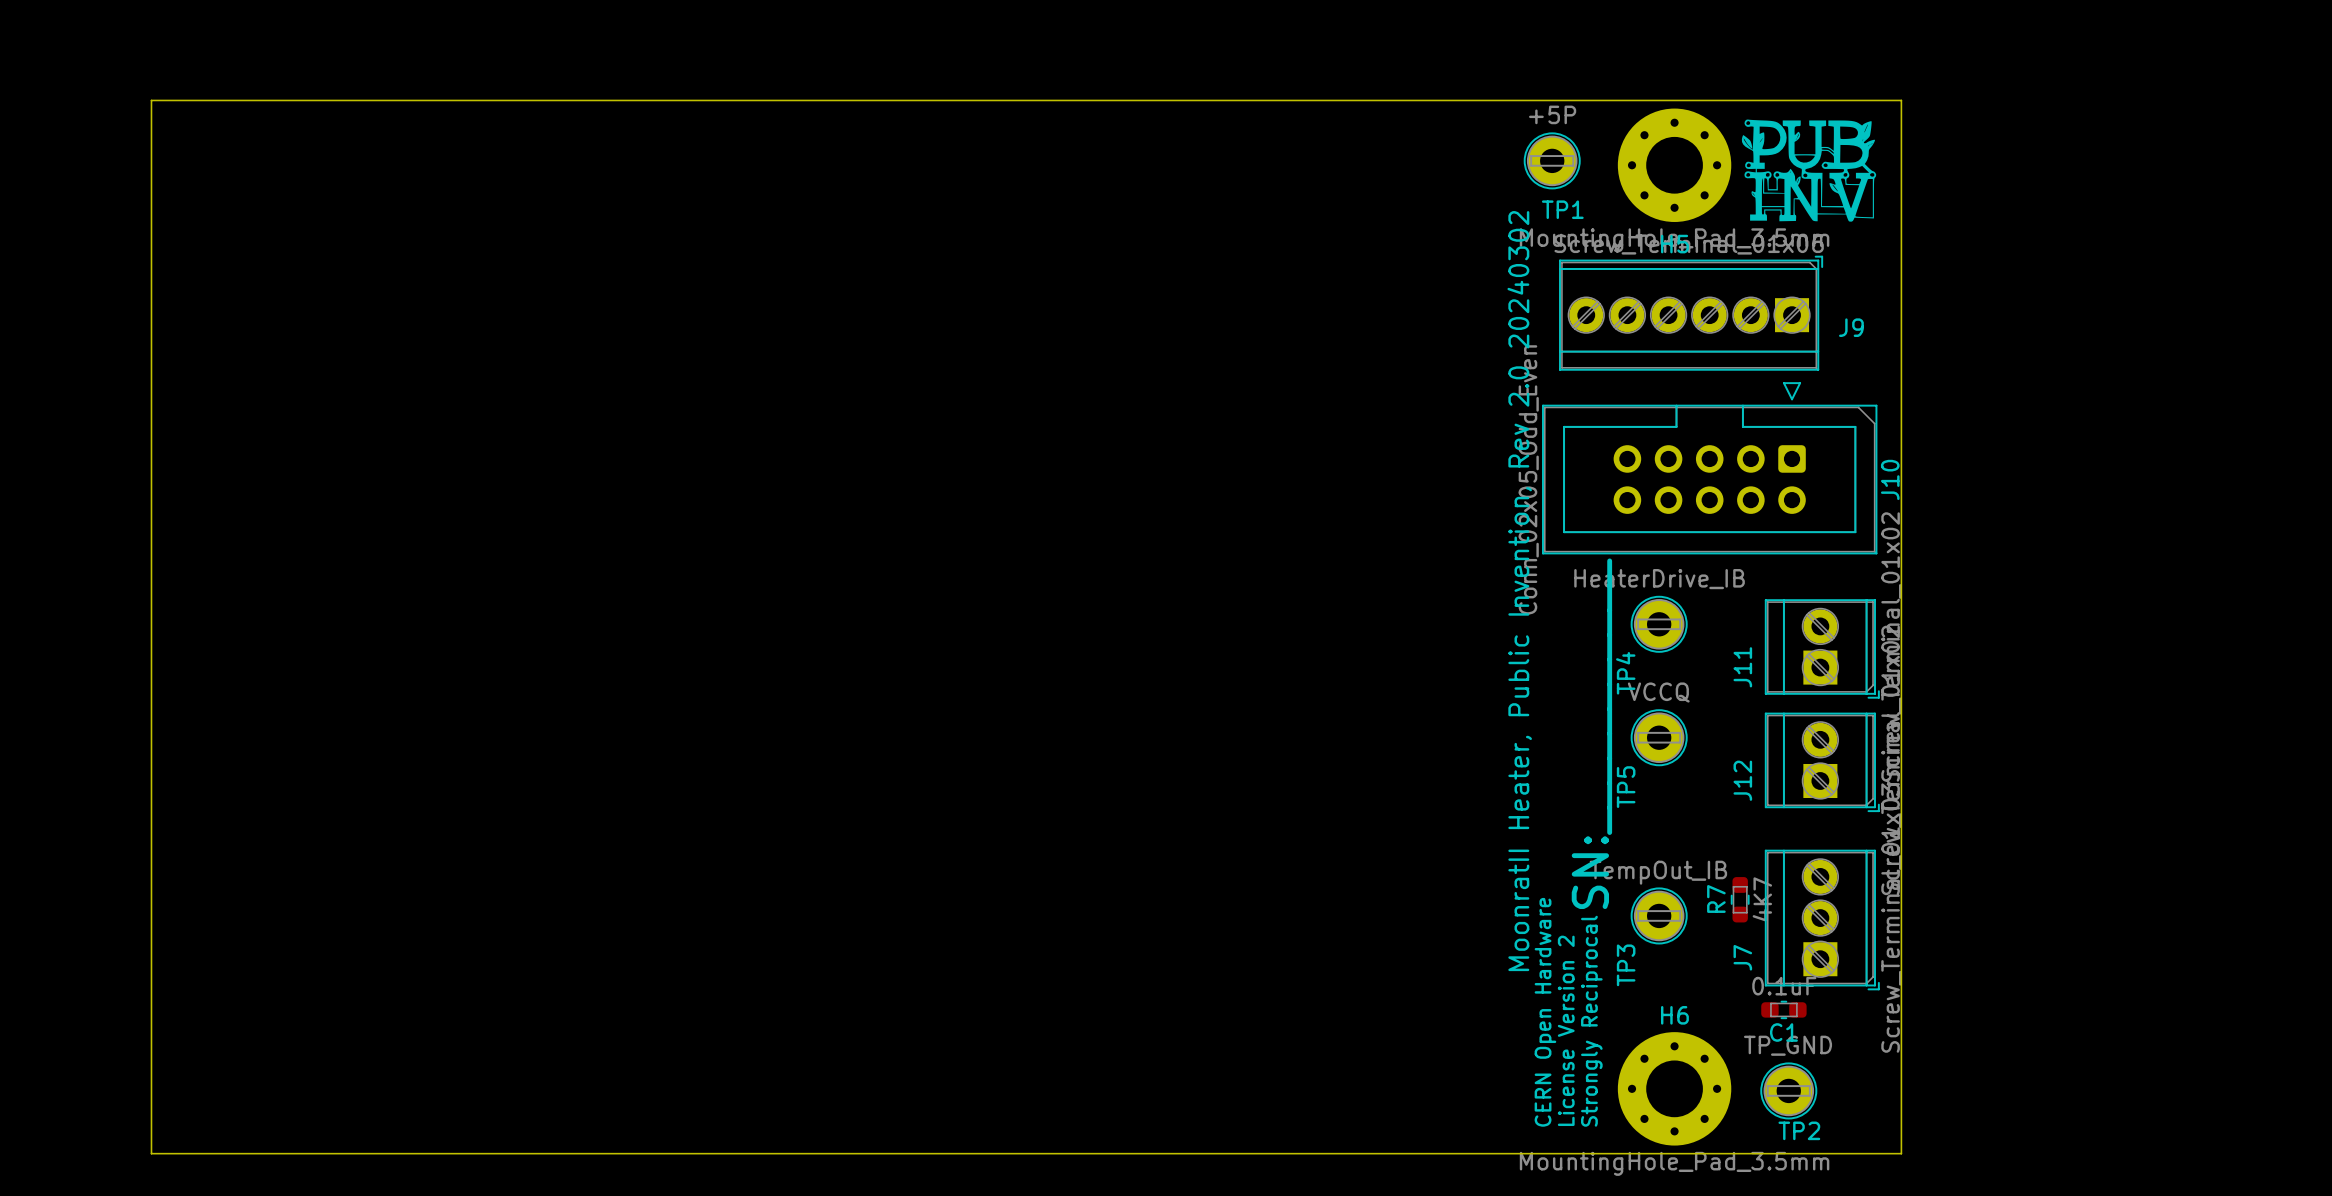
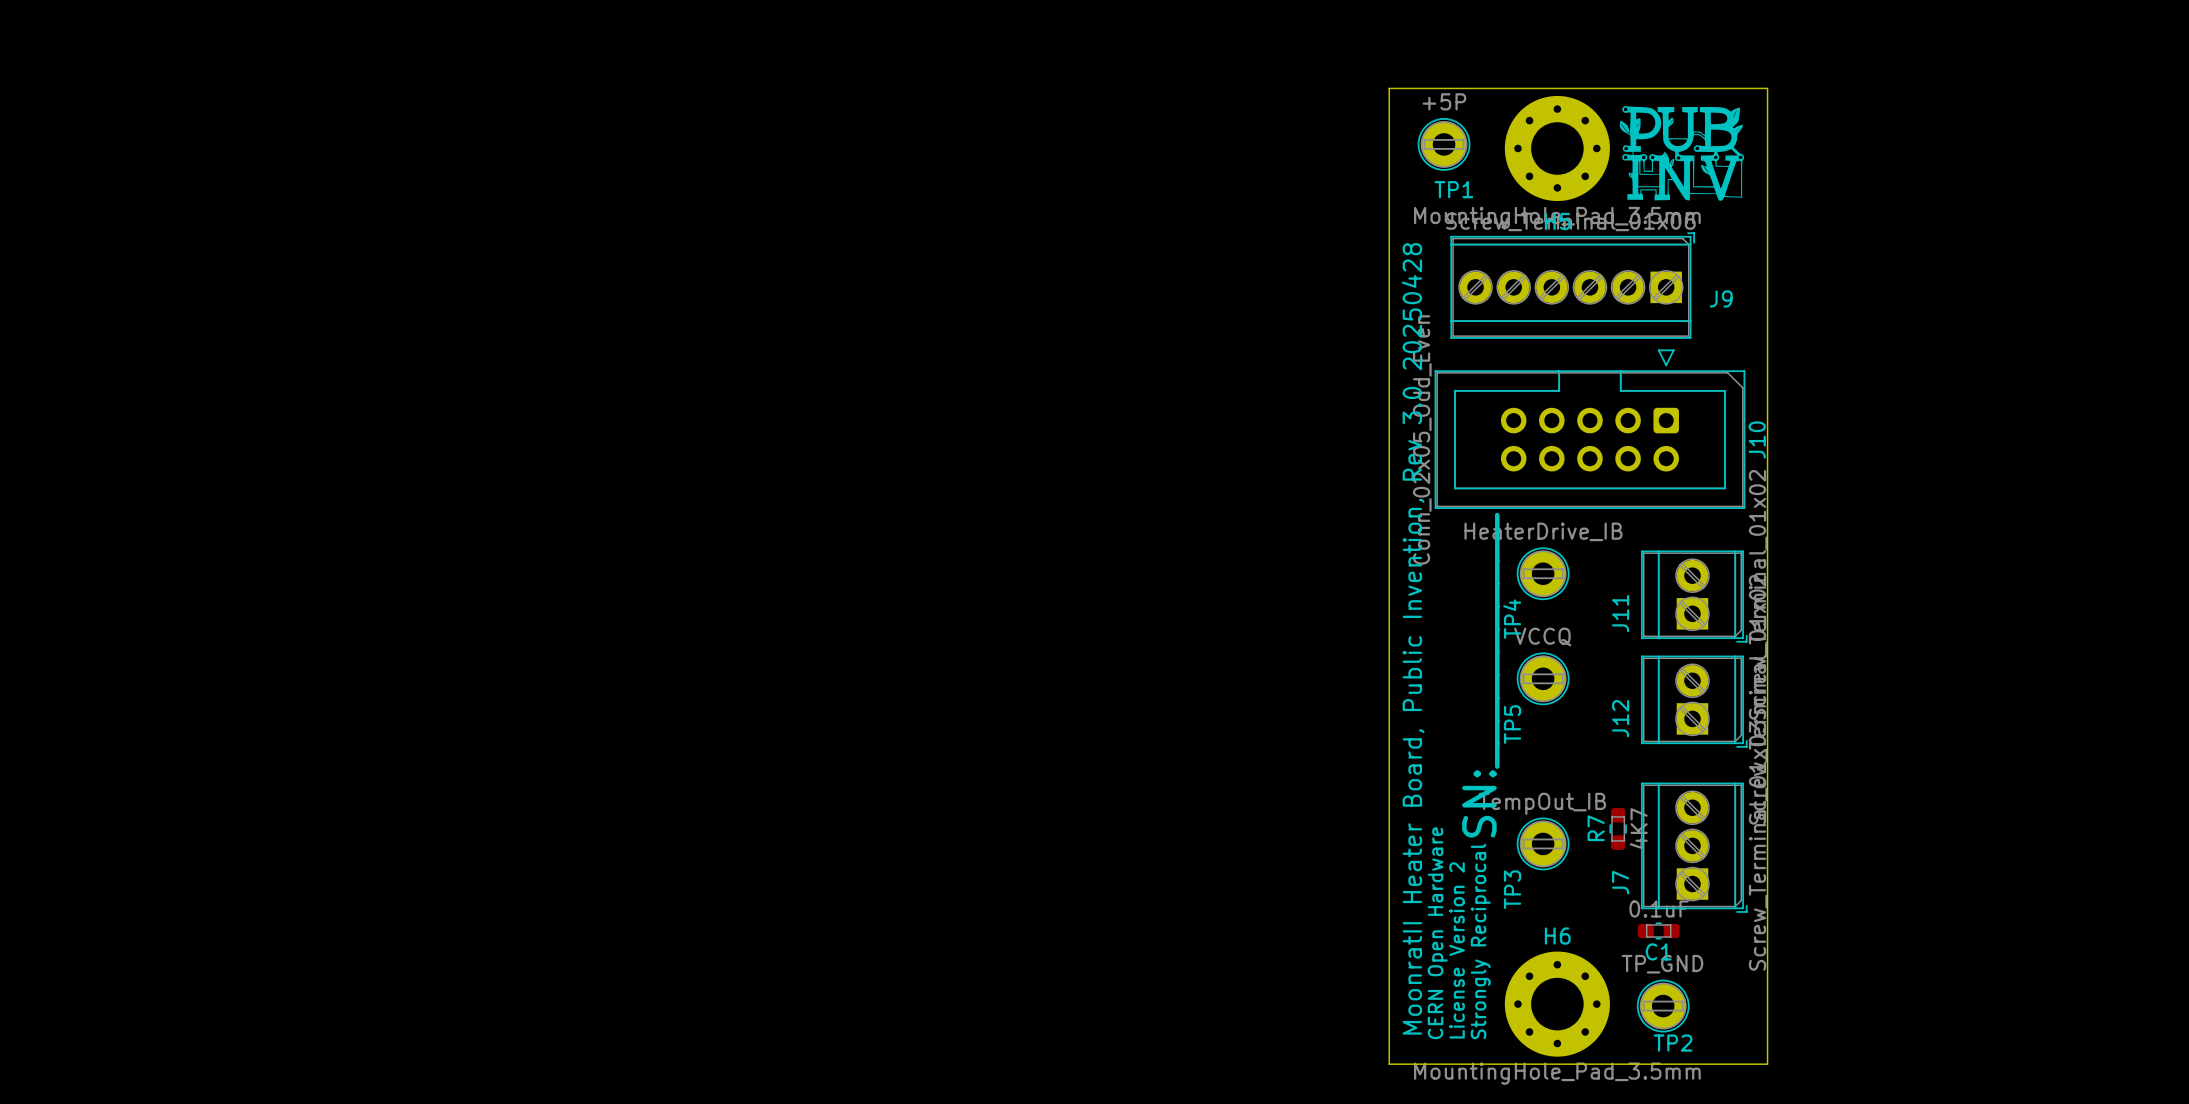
board edge: (1493, 100) (151, 100) (151, 1153) (1493, 1153) -> (1389, 88) (1389, 1064)
text: MoonratII Heater, Public Invention, Rev 2.0 20240302 (1519, 591) -> MoonratII Heater Board, Public Invention, Rev 3.0 20250428 (1413, 638)

